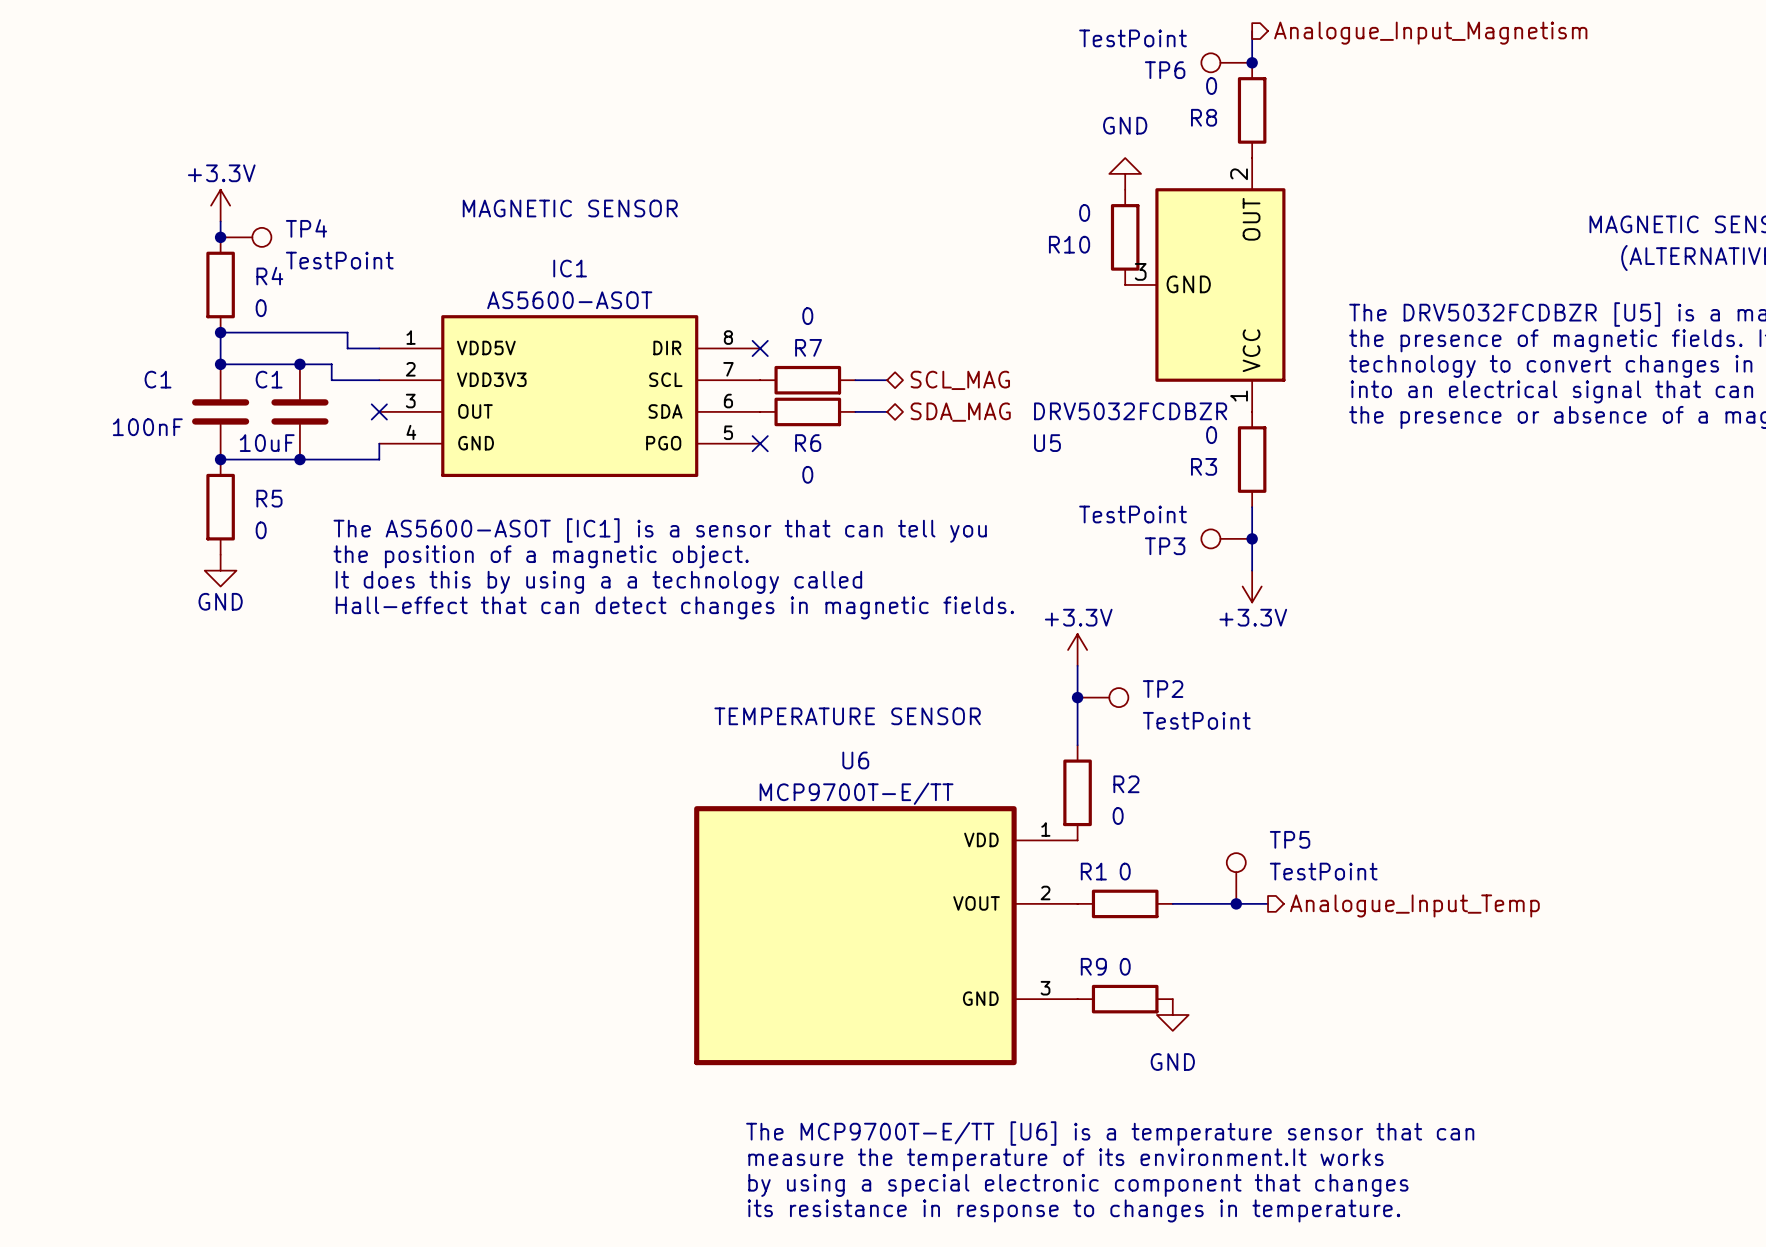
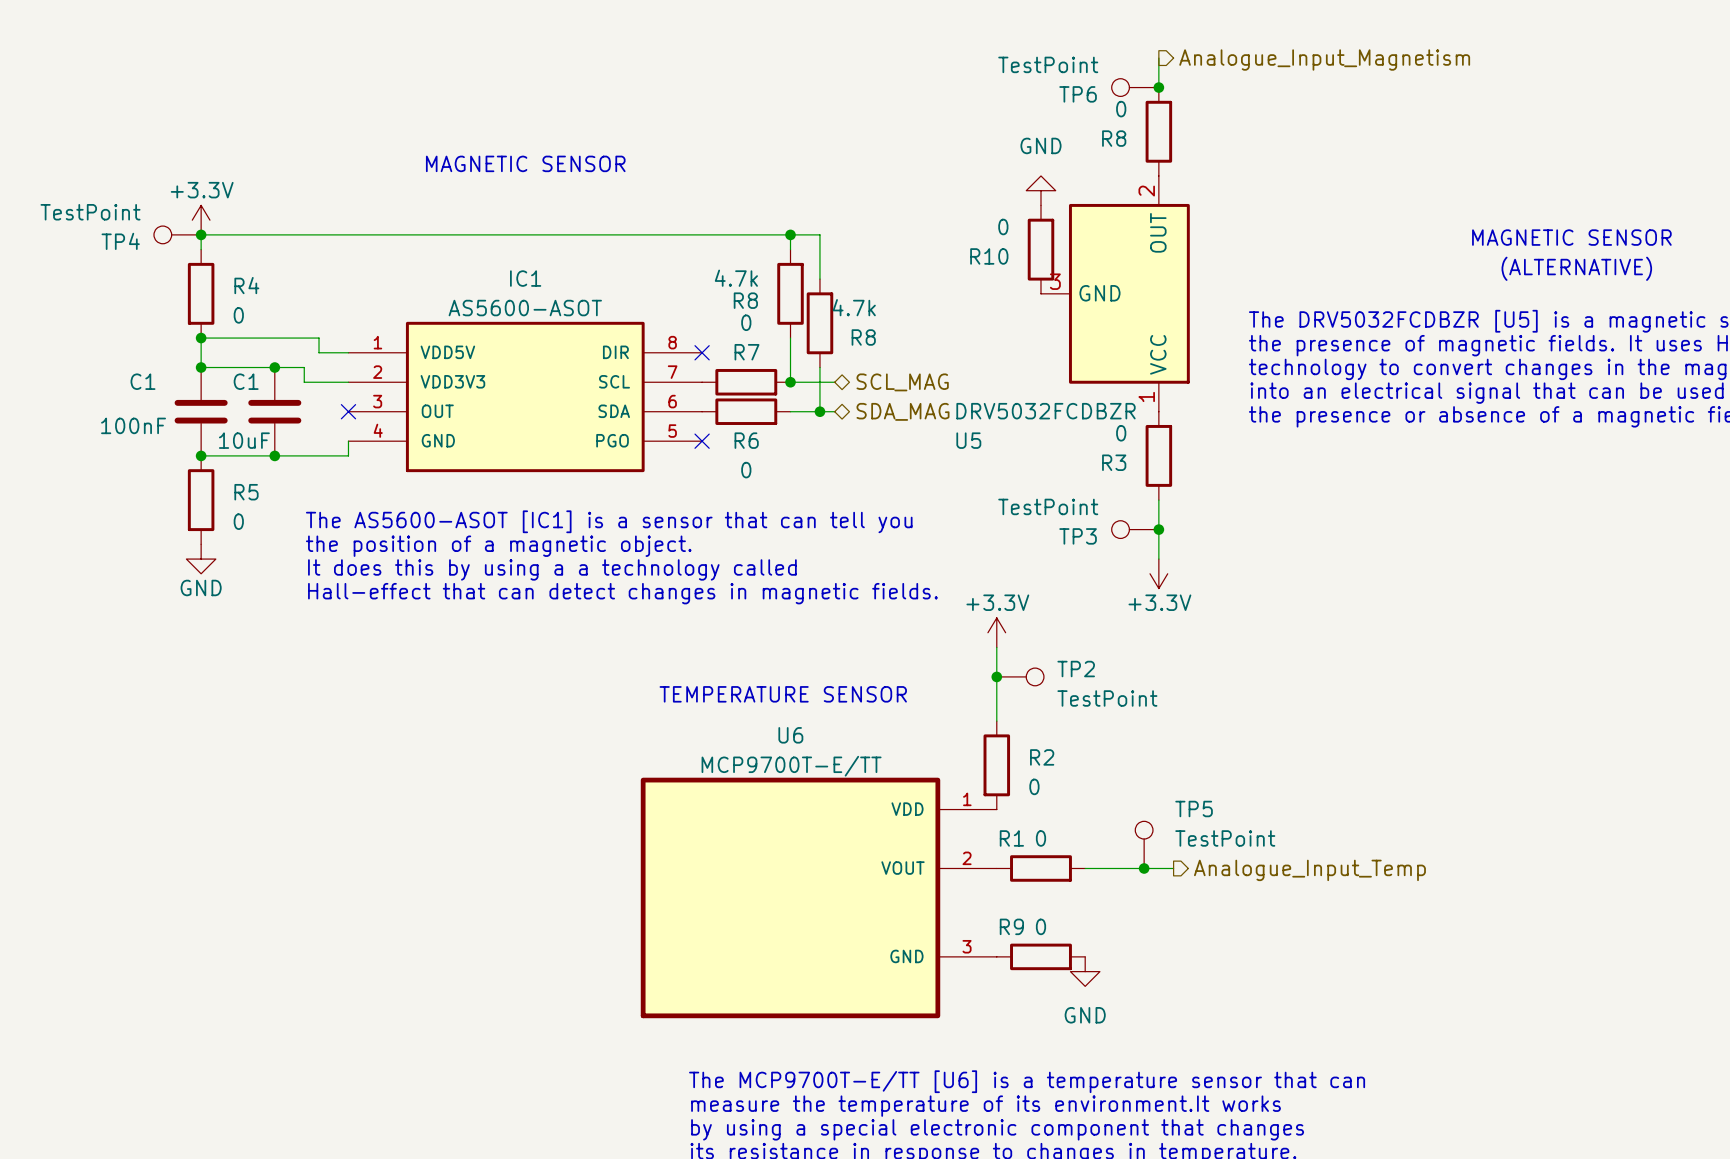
text position: MAGNETIC SENSOR (570, 208) -> MAGNETIC SENSOR (525, 163)
wire: none -> (201, 234) (819, 234) (819, 279)
wire: none -> (790, 234) (790, 249)
junction: none -> (790, 234)
junction position: (220, 237) -> (201, 234)
TP4 position: (246, 237) -> (177, 234)
TP4 rotation: 0° (261, 237) -> 180° (162, 234)
R8: none -> 4.7k (790, 293)
R8: none -> 4.7k (819, 323)
wire: none -> (790, 338) (790, 382)
wire: none -> (819, 367) (819, 411) (834, 411)
junction: none -> (790, 382)
wire: none -> (819, 382) (834, 382)
hierarchical label position: SCL_MAG (960, 380) -> SCL_MAG (902, 382)
junction: none -> (819, 411)
hierarchical label position: SDA_MAG (960, 412) -> SDA_MAG (903, 411)

